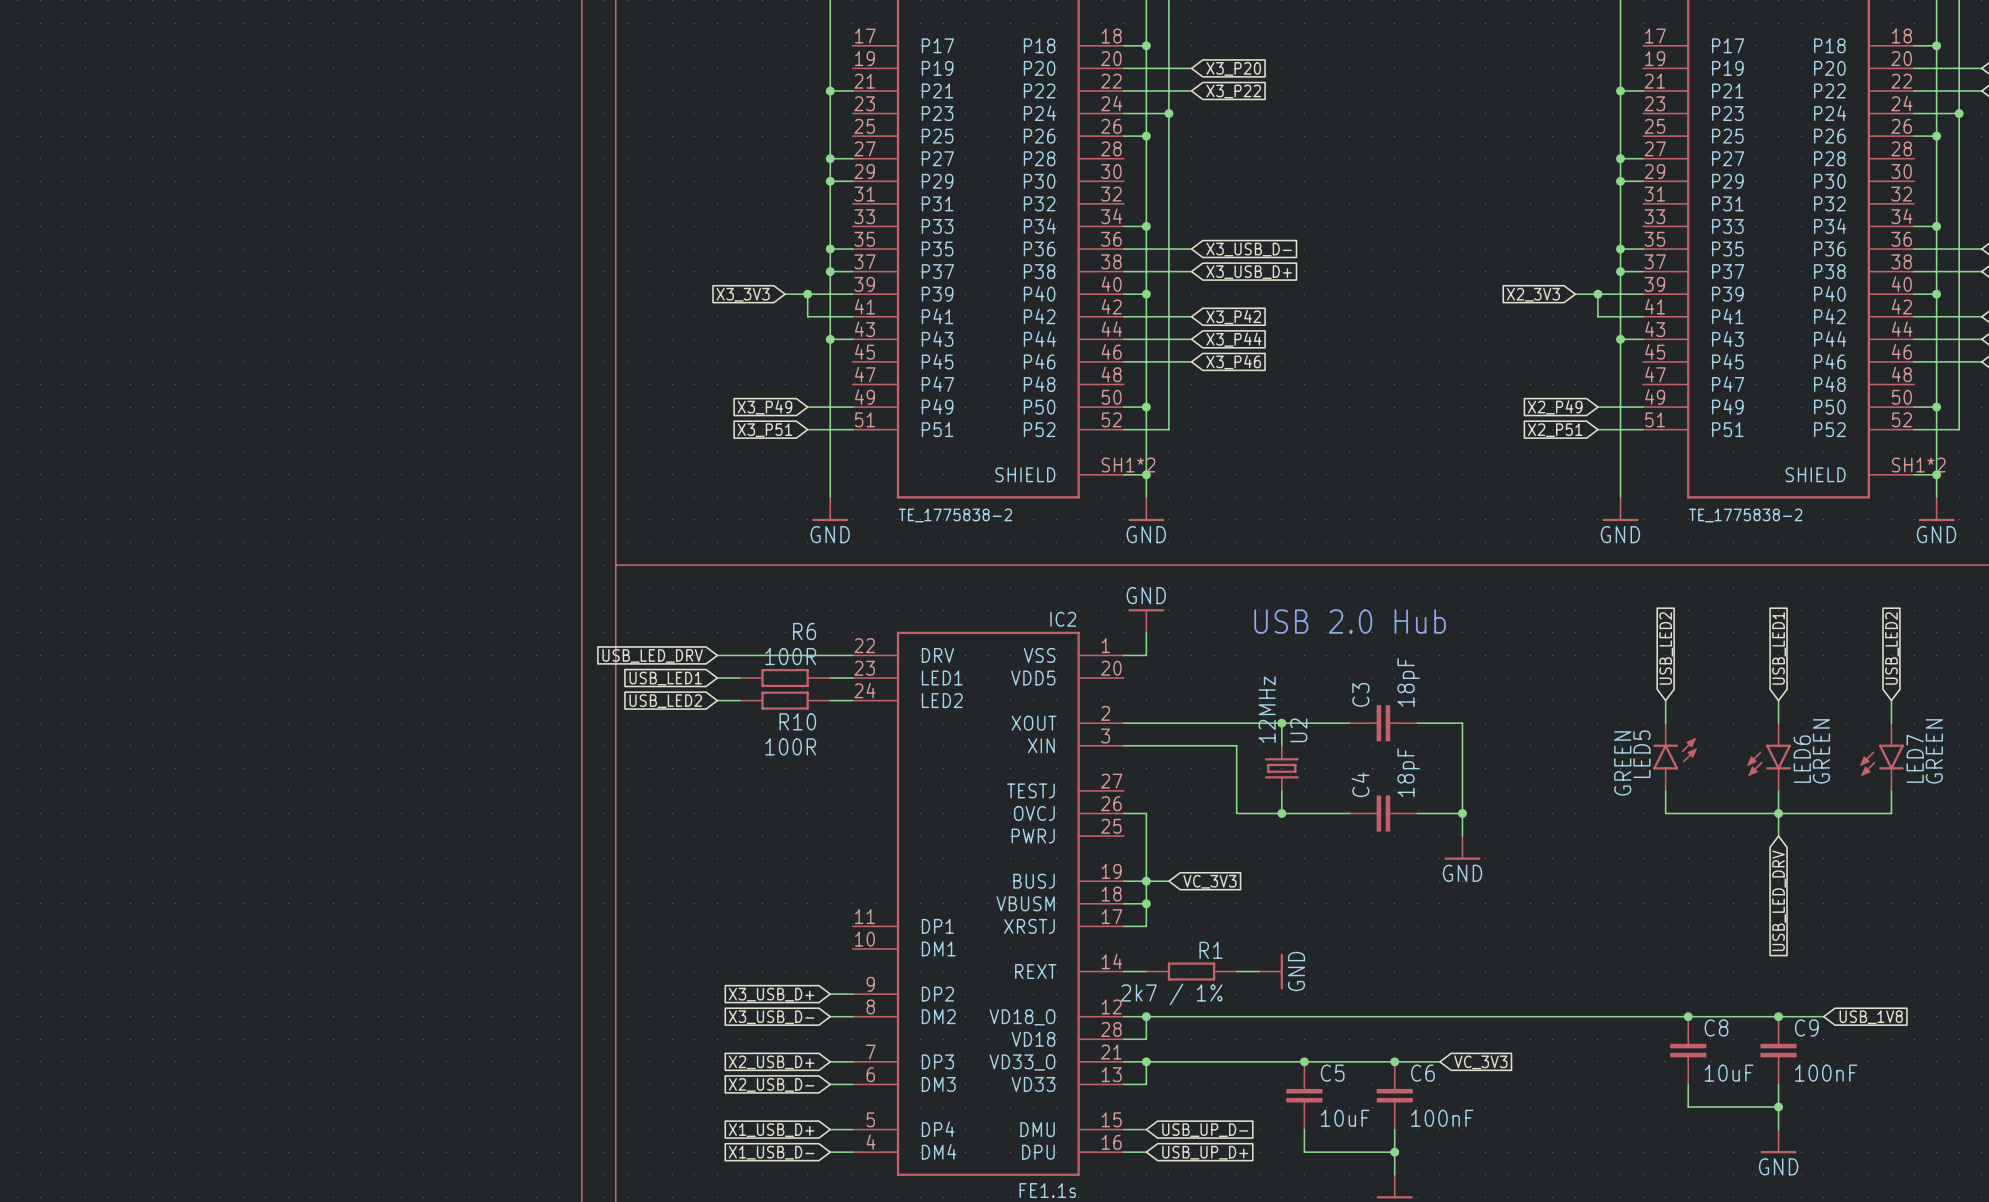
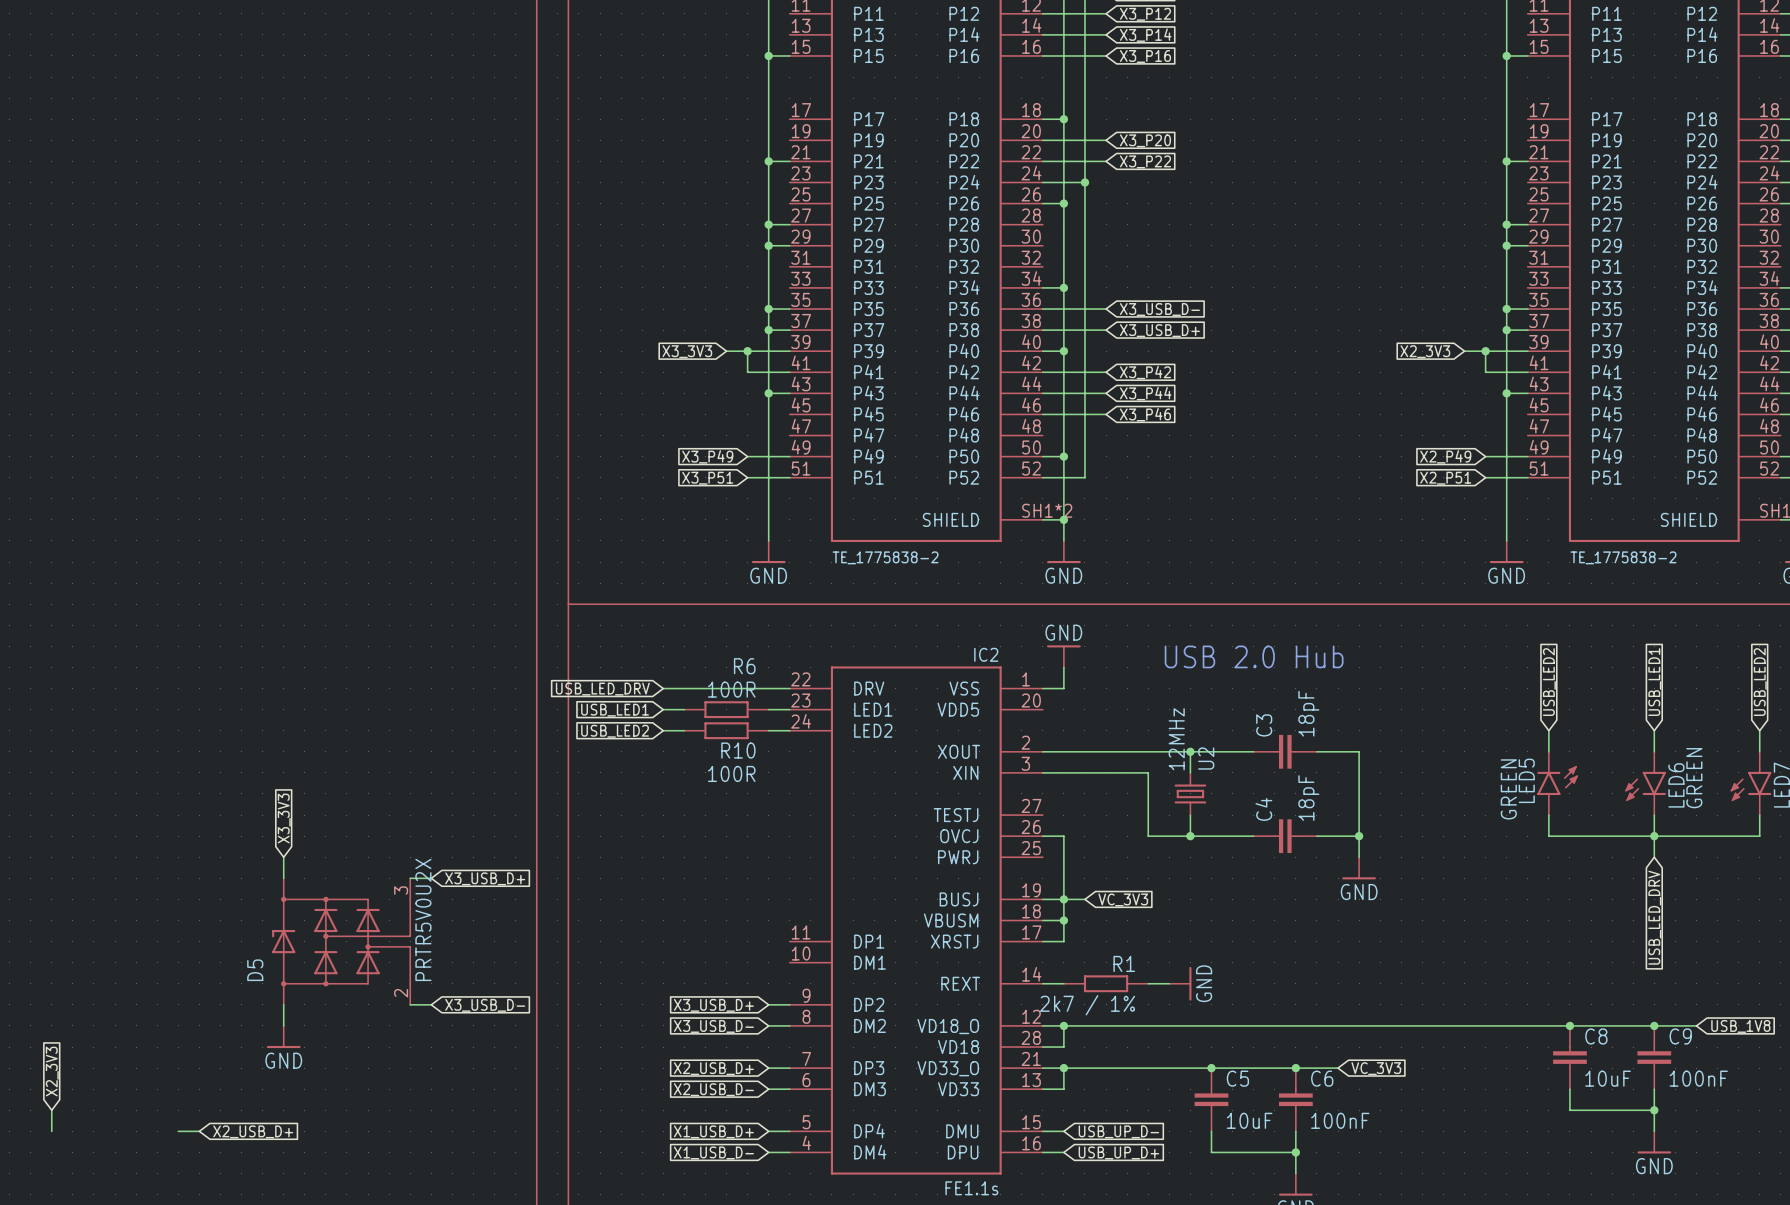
global label: none -> X3_3V3 (284, 818)
wire: none -> (283, 857) (283, 878)
wire: none -> (410, 878) (431, 878)
global label: none -> X3_USB_D+ (485, 878)
D5: none -> PRTR5V0U2X (341, 941)
wire: none -> (283, 1004) (283, 1025)
wire: none -> (410, 1004) (431, 1004)
global label: none -> X3_USB_D- (485, 1005)
power symbol: none -> GND (283, 1037)
global label: none -> X2_3V3 (52, 1071)
wire: none -> (51, 1110) (51, 1131)
wire: none -> (178, 1131) (199, 1131)
global label: none -> X2_USB_D+ (253, 1131)

